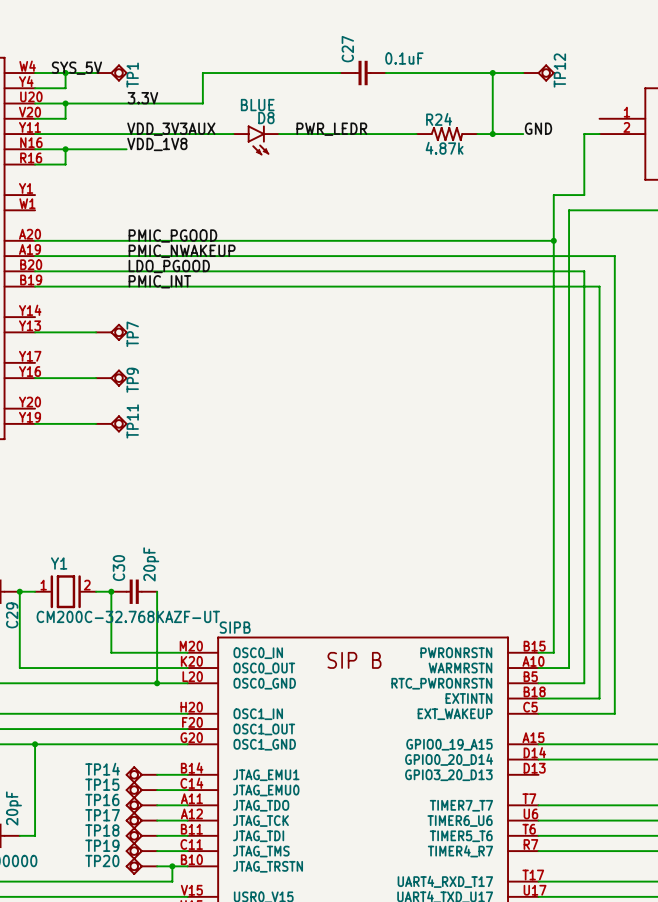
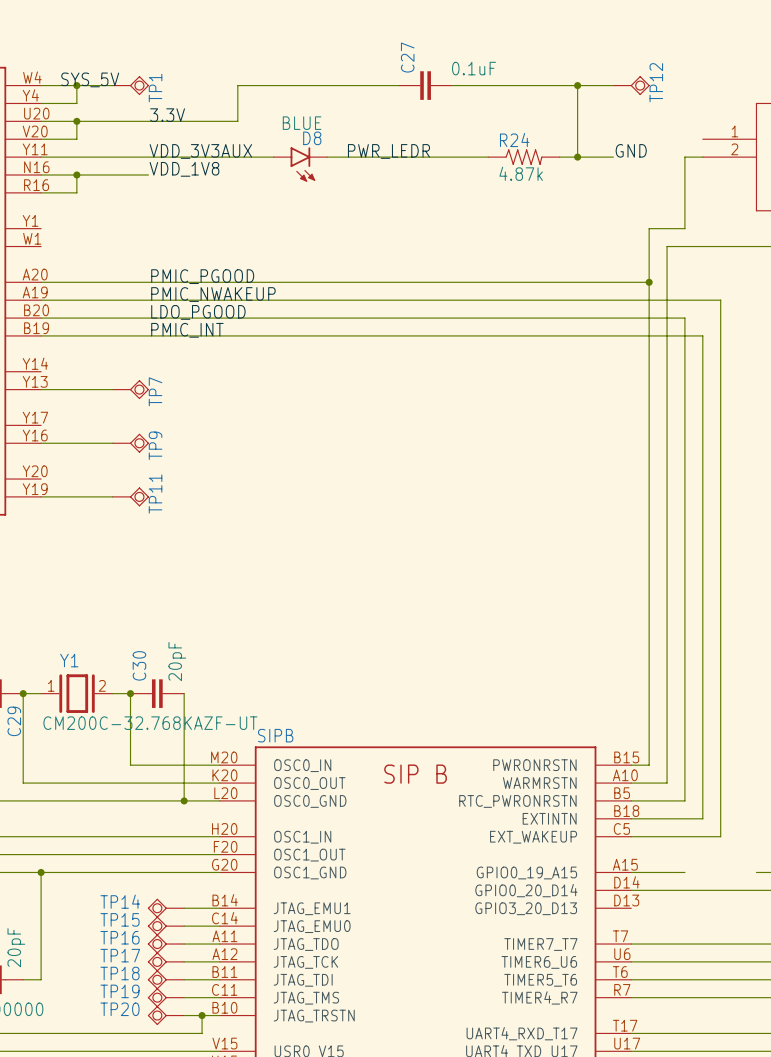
wire: (584, 744) (645, 744) -> none

